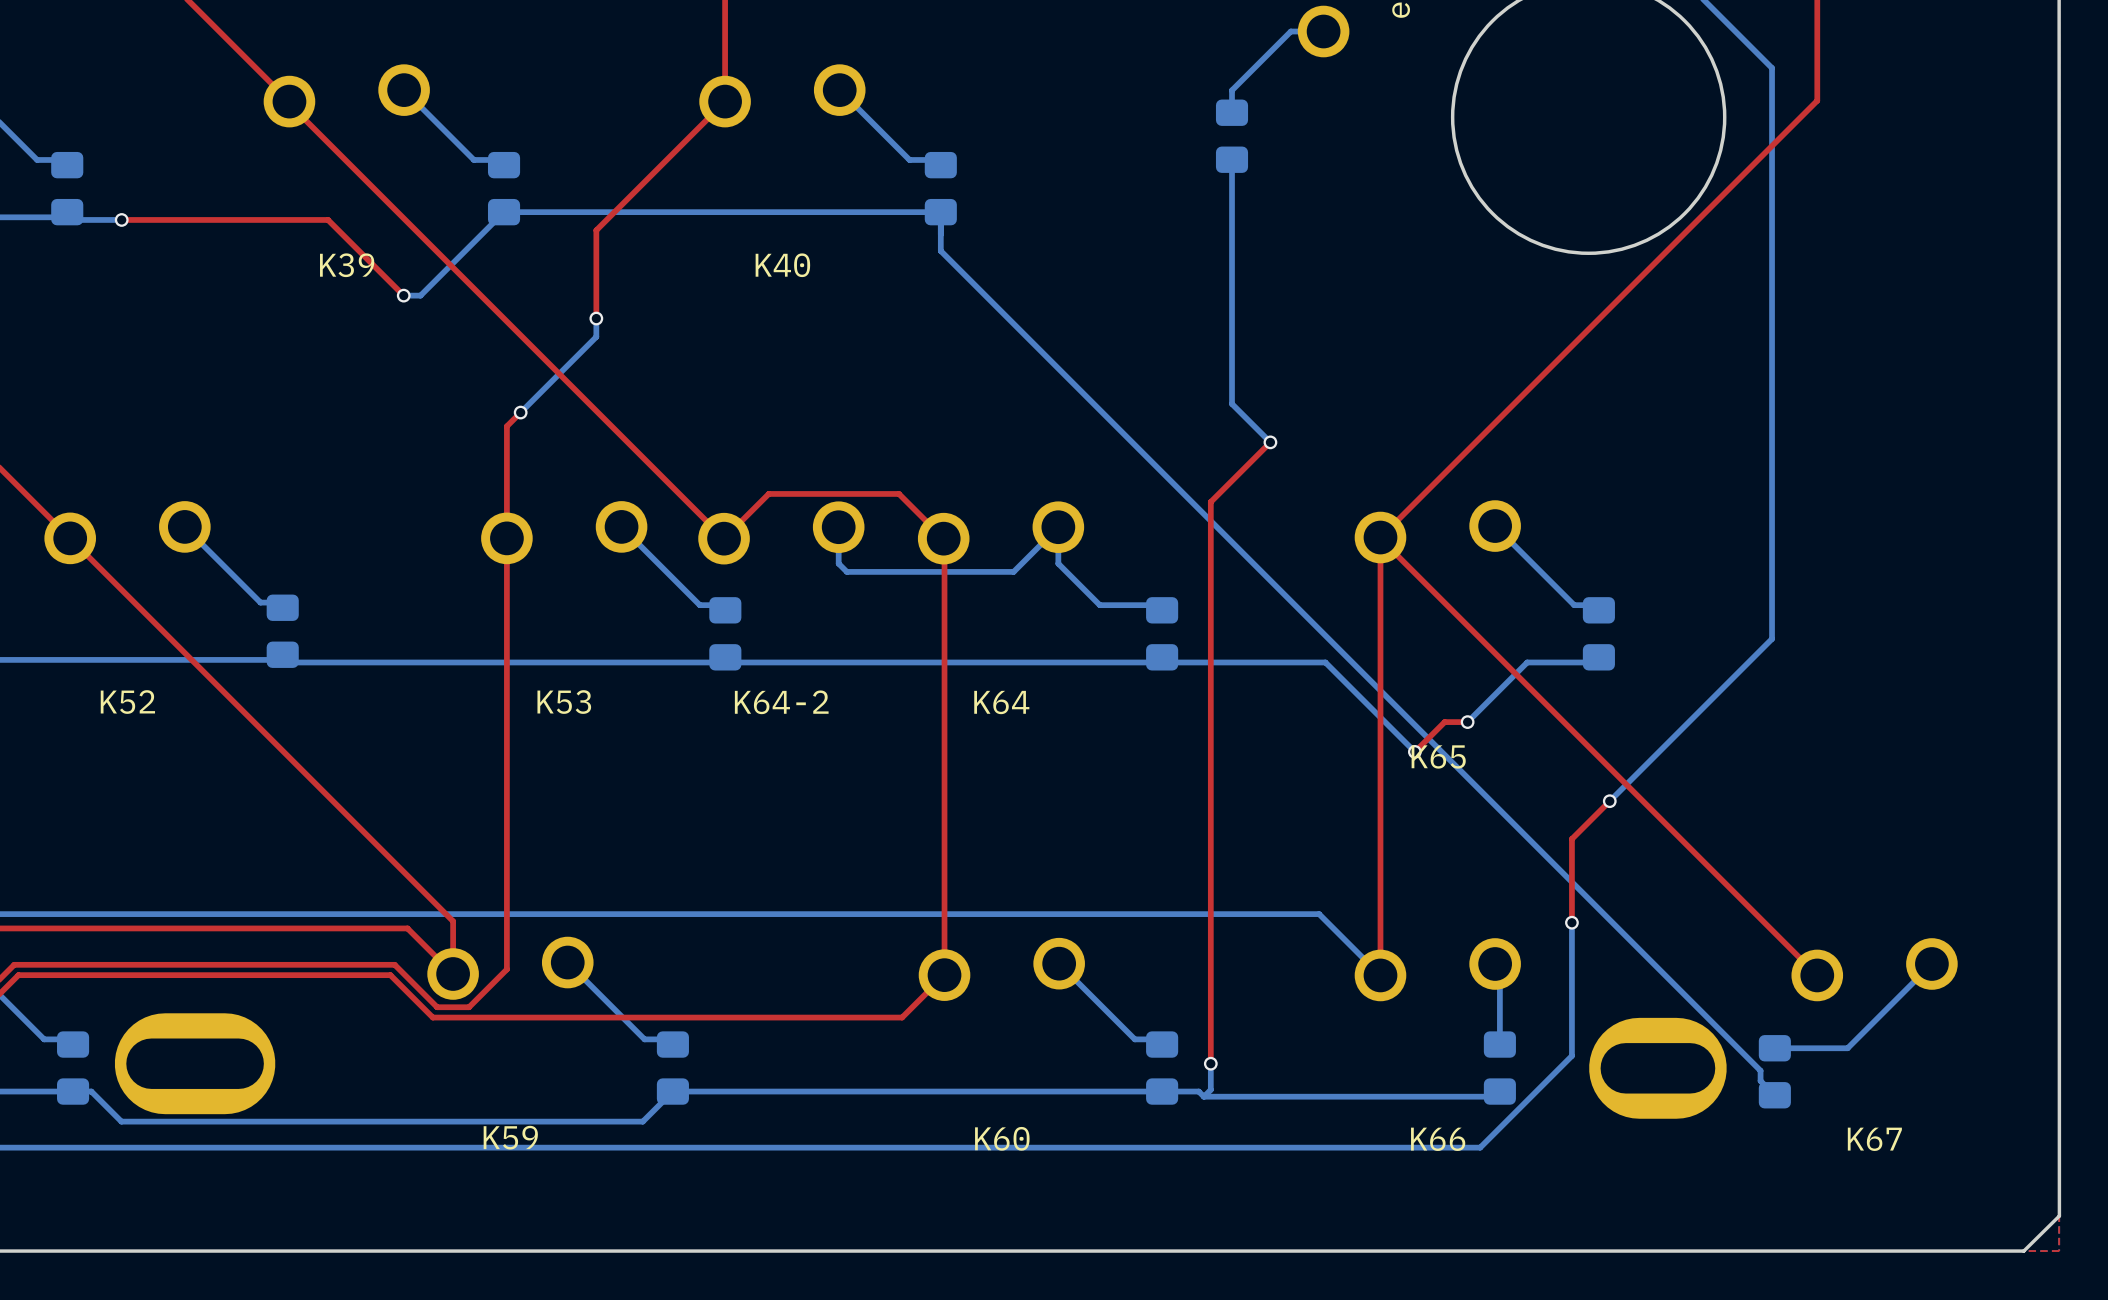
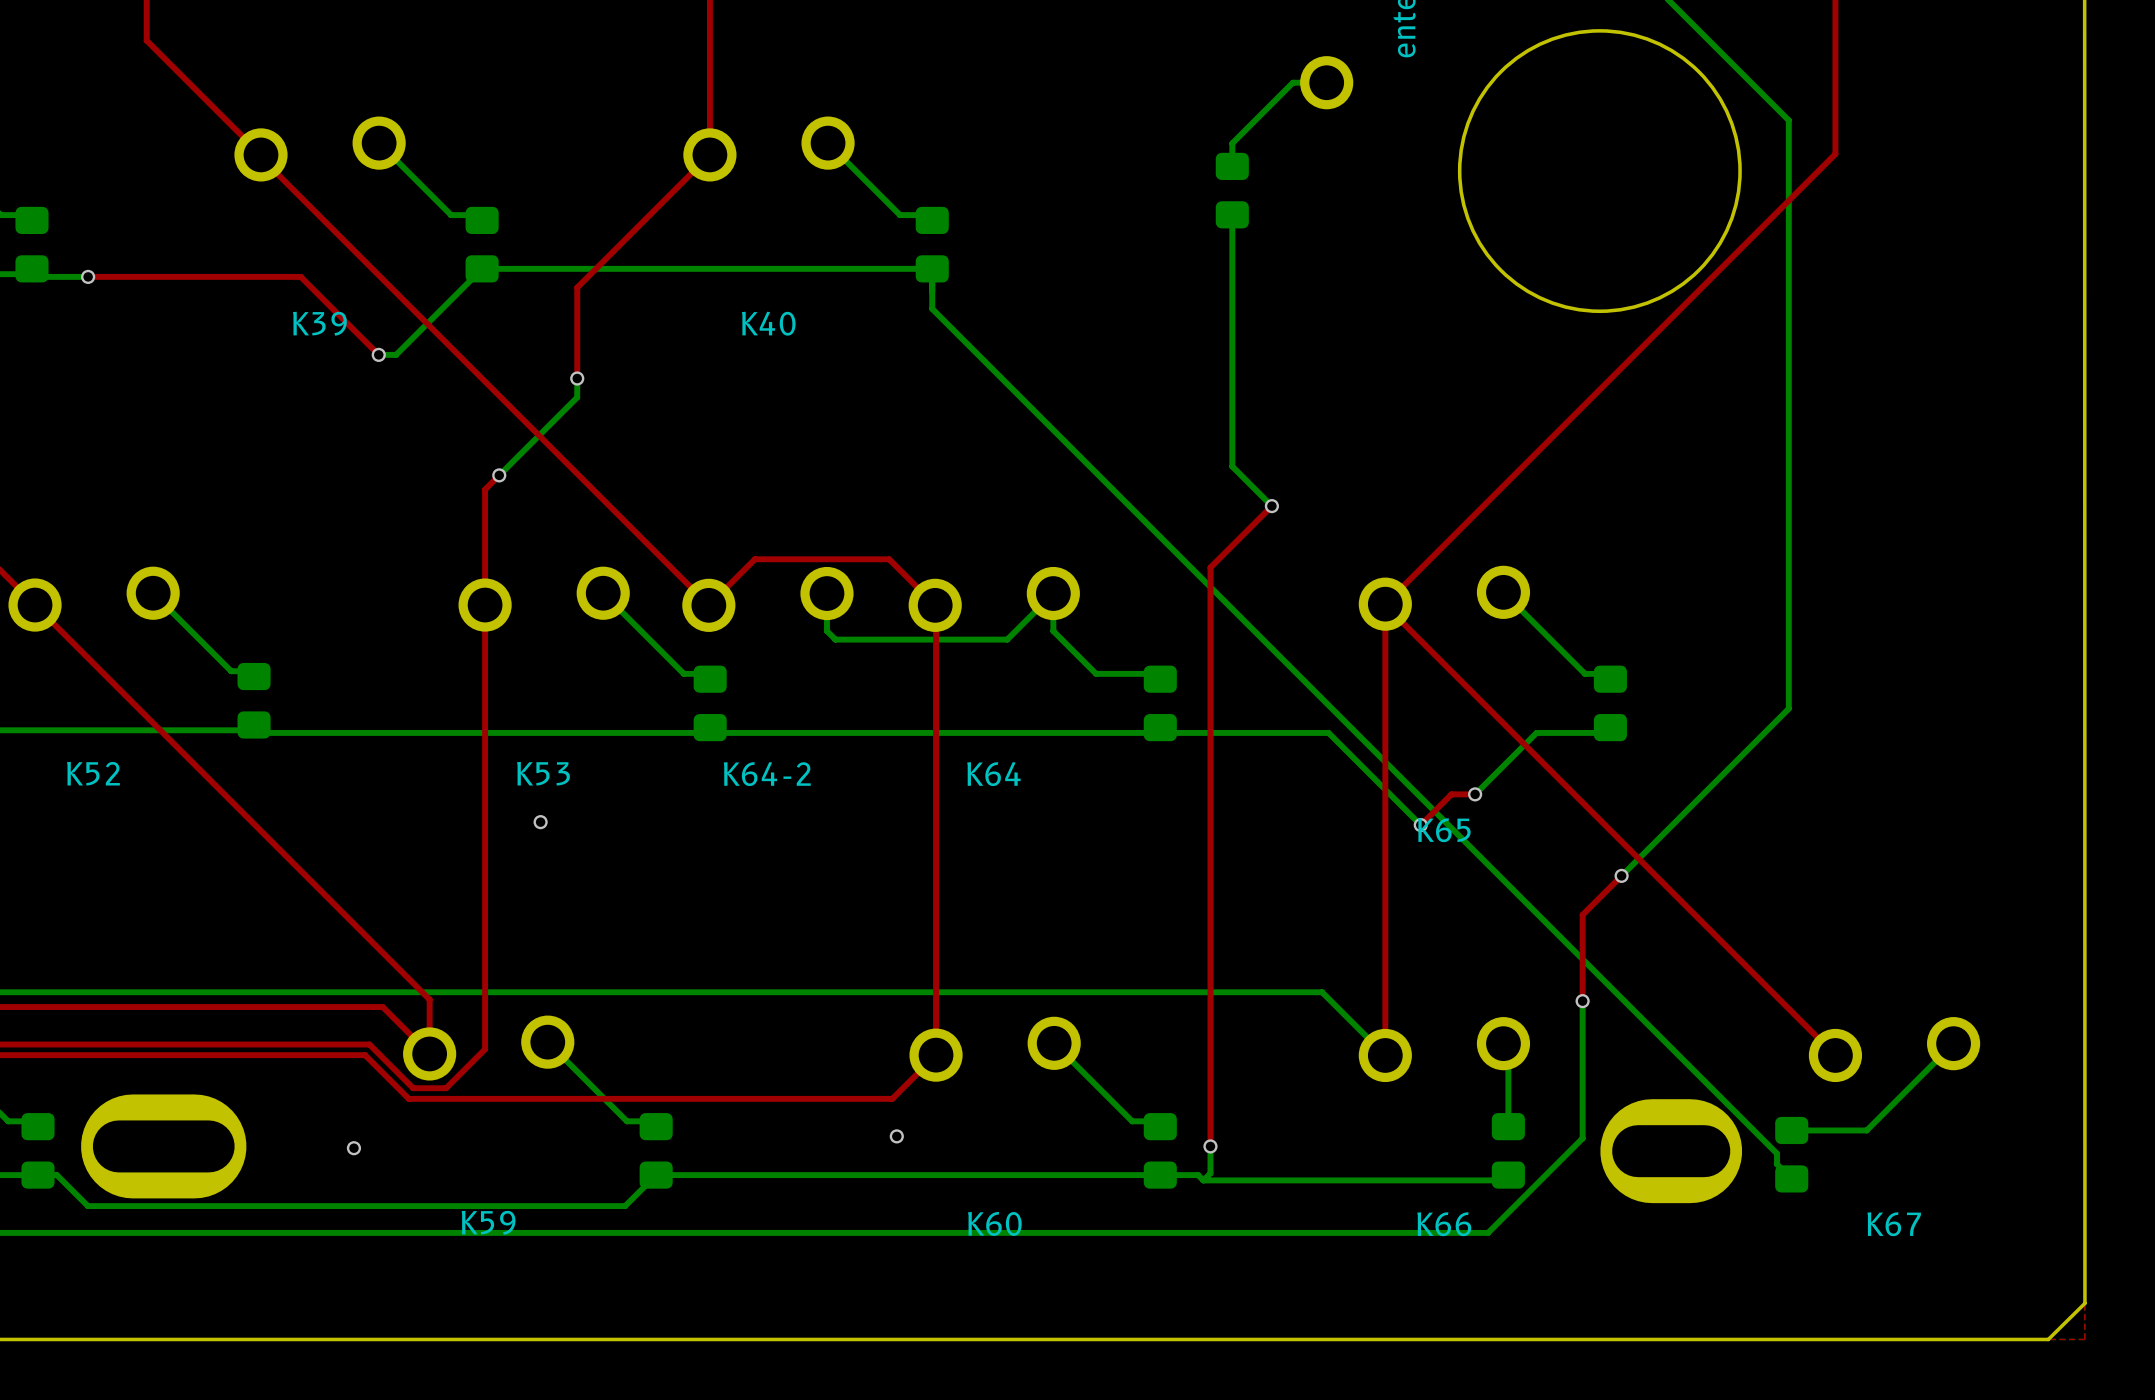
via: none -> (540, 822)
via: none -> (896, 1136)
via: none -> (353, 1148)

